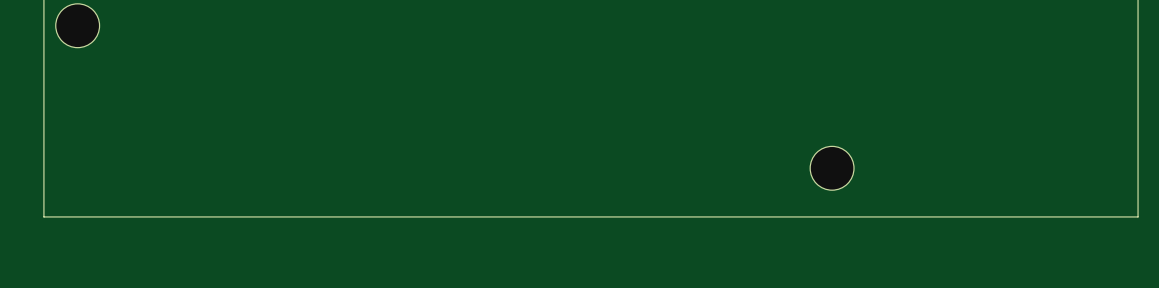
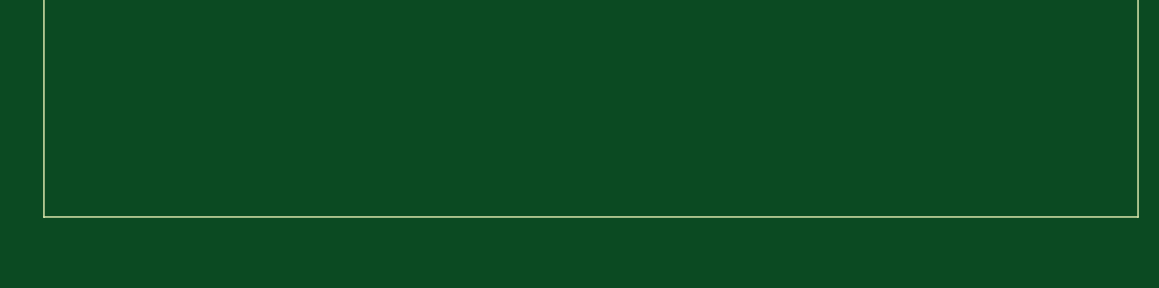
hole: (77, 25) -> none
hole: (832, 168) -> none

